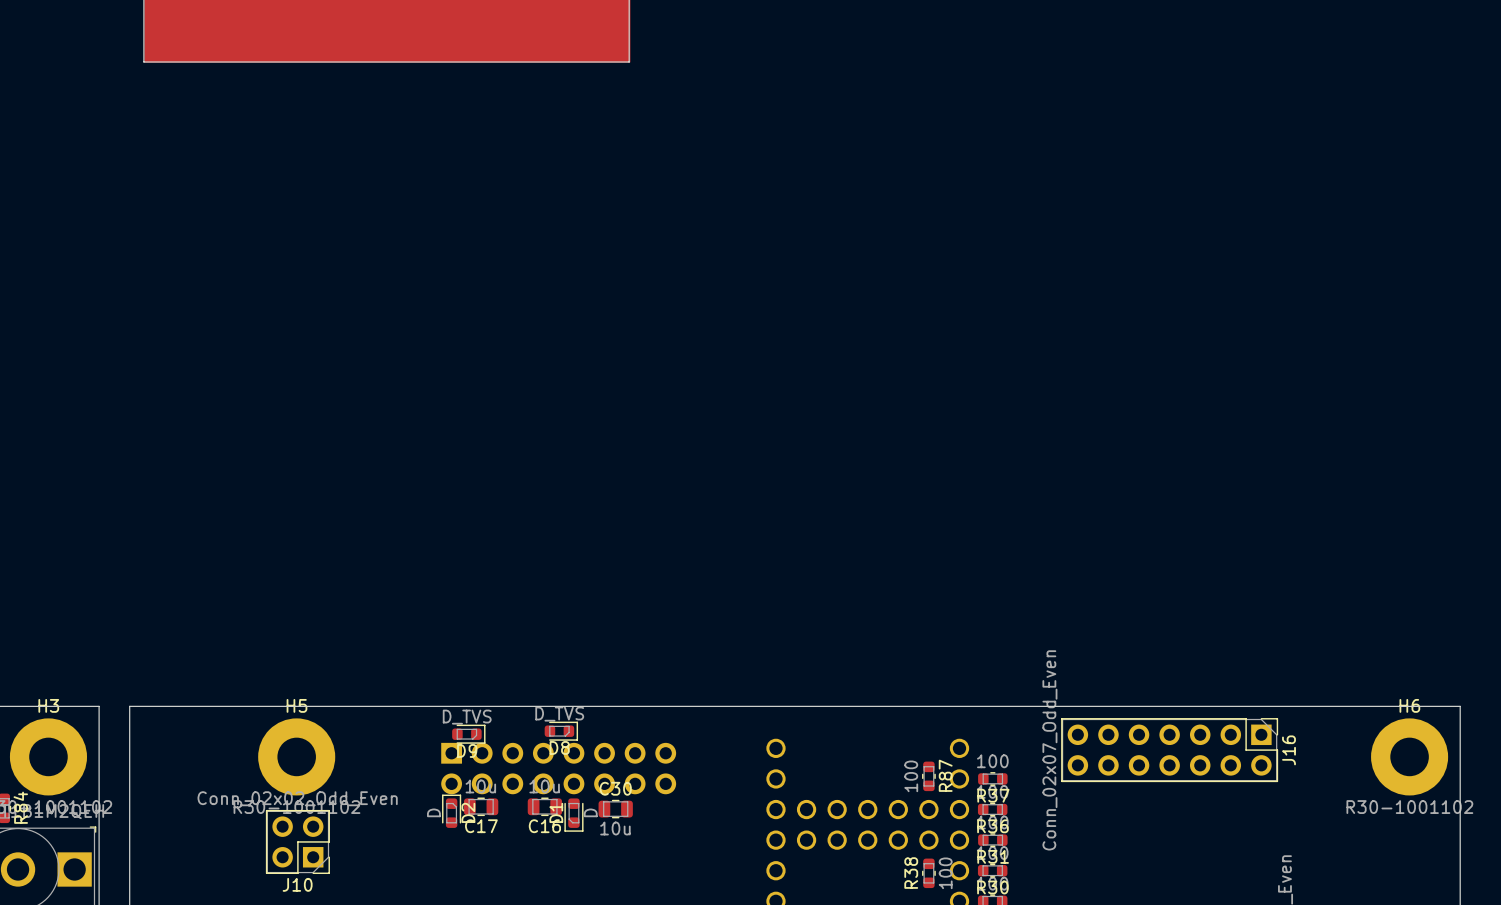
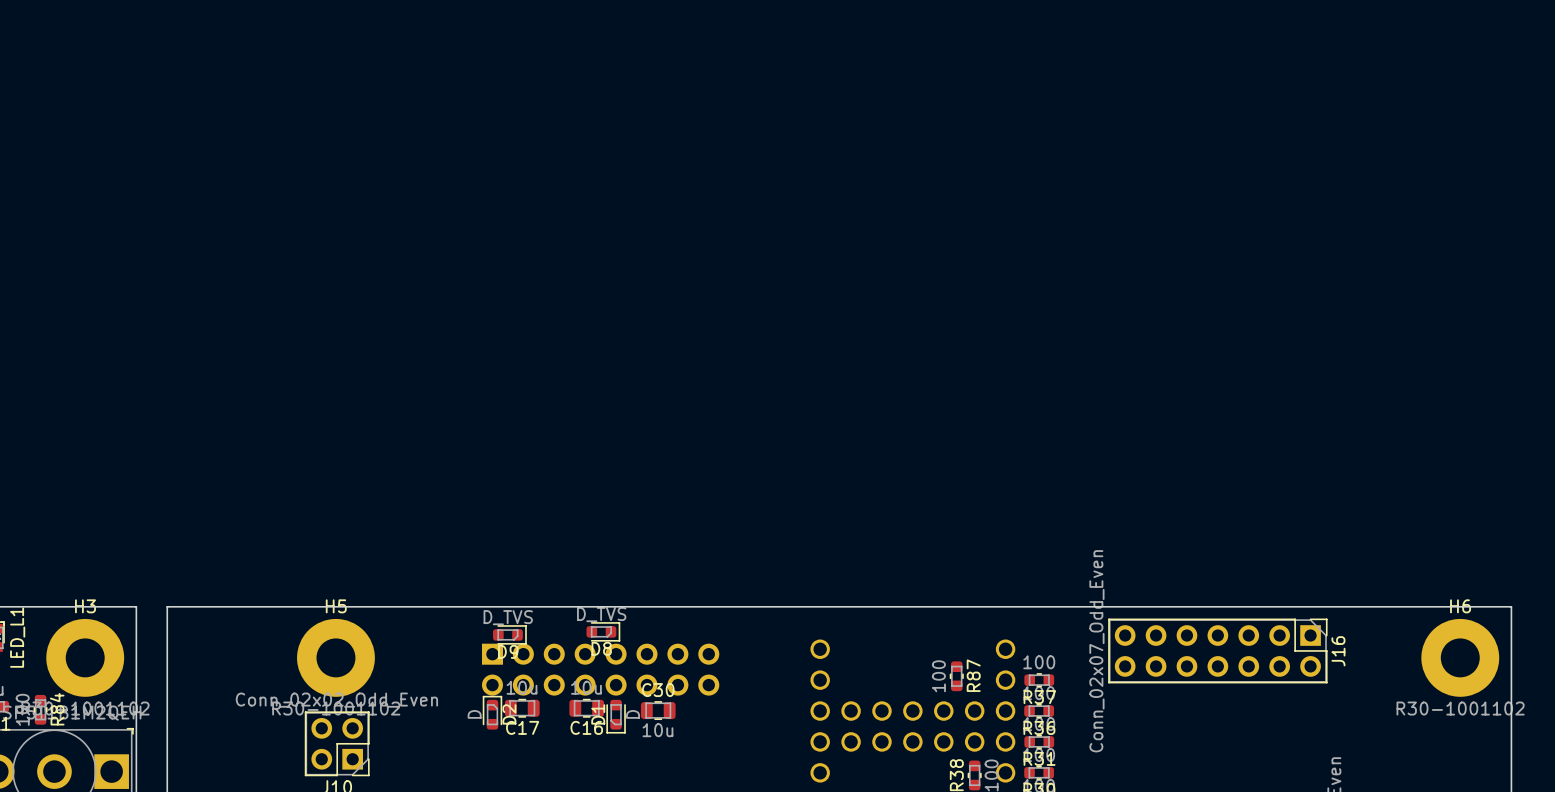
R87 position: (928, 776) -> (956, 676)

